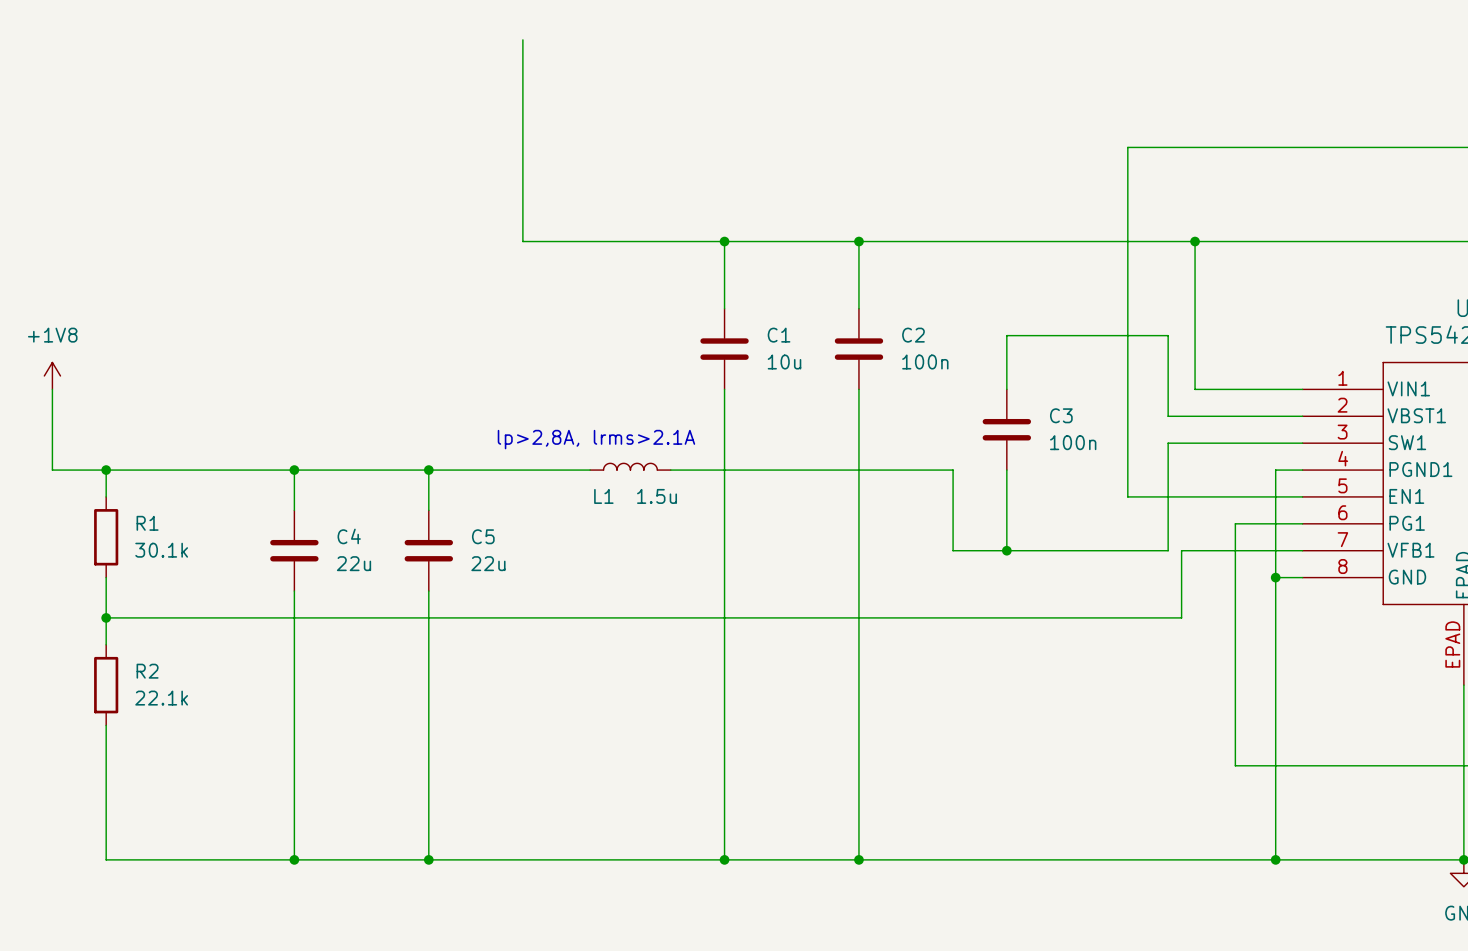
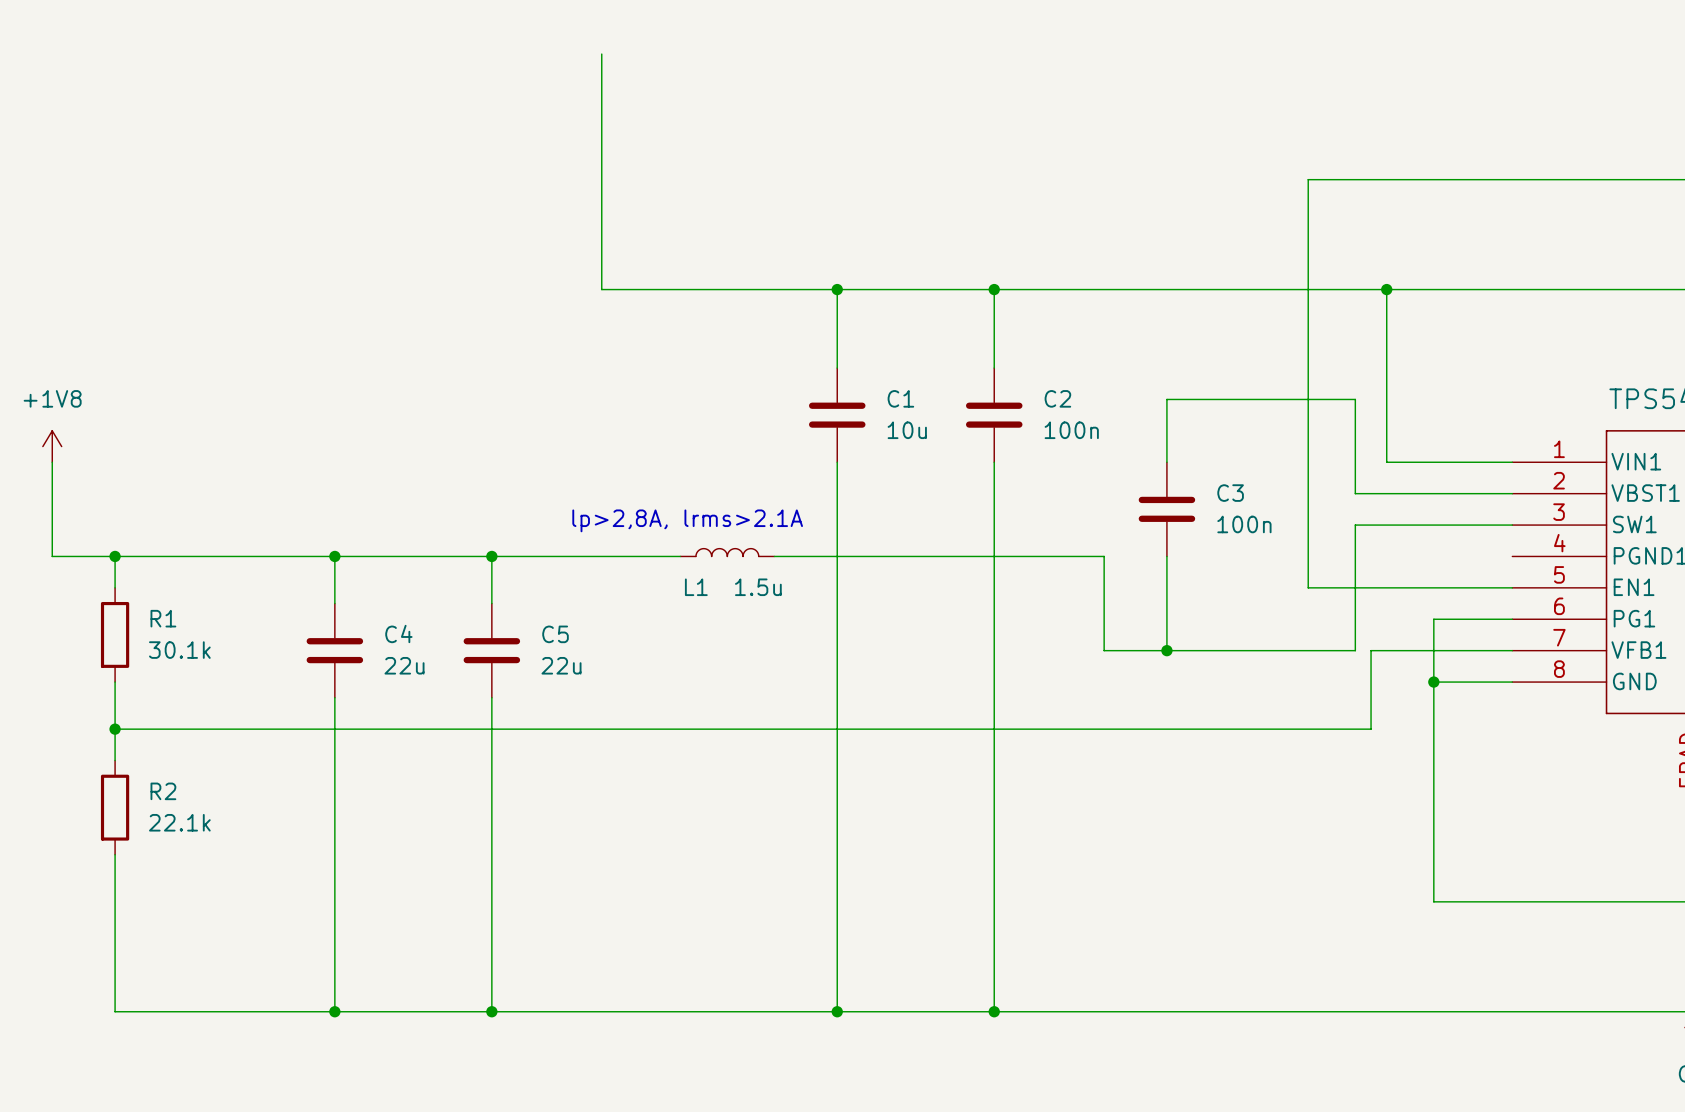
wire: (1302, 470) (1275, 470) (1275, 859) -> none
wire: none -> (1433, 682) (1480, 682)
junction position: (1275, 577) -> (1433, 682)
junction: (1275, 859) -> none

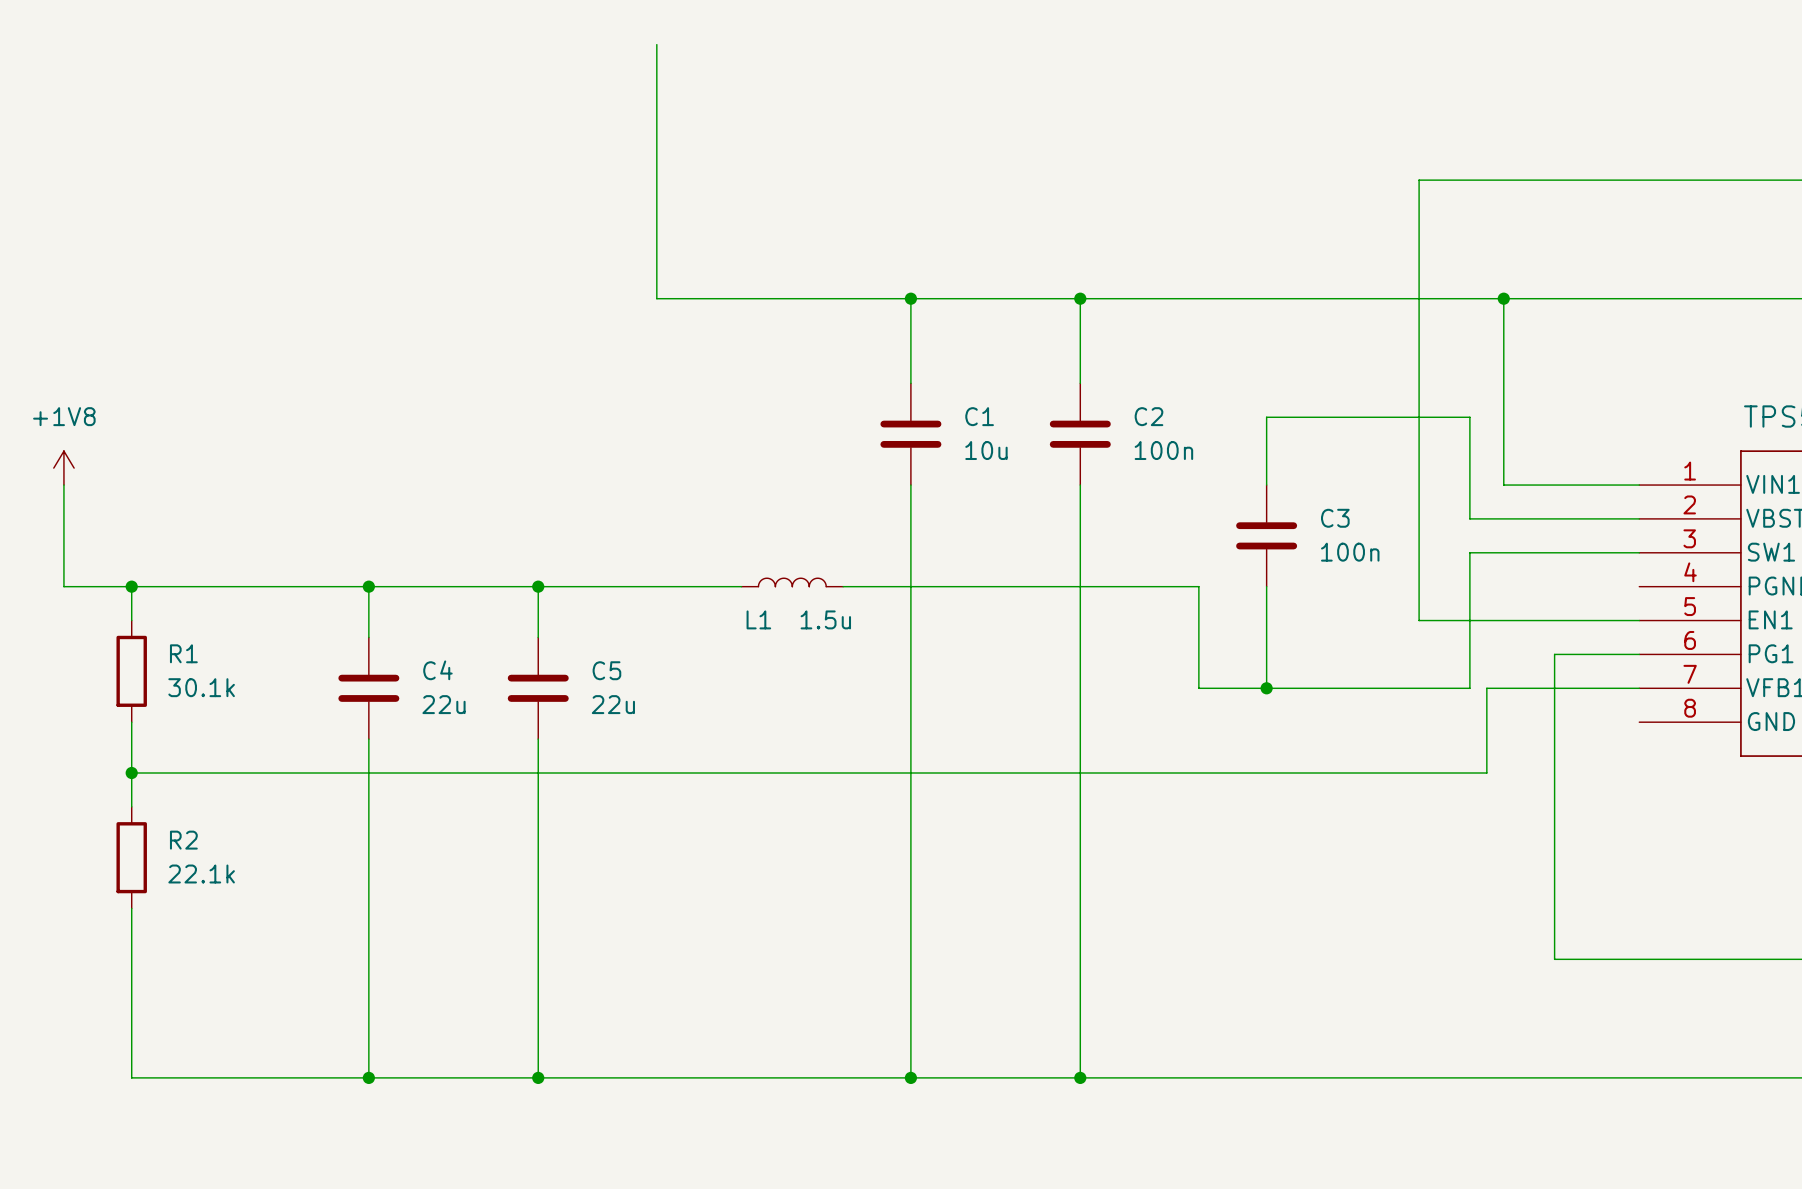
text: lp>2,8A, lrms>2.1A (687, 520) -> none
wire: (1433, 682) (1512, 682) -> none
junction: (1433, 682) -> none

